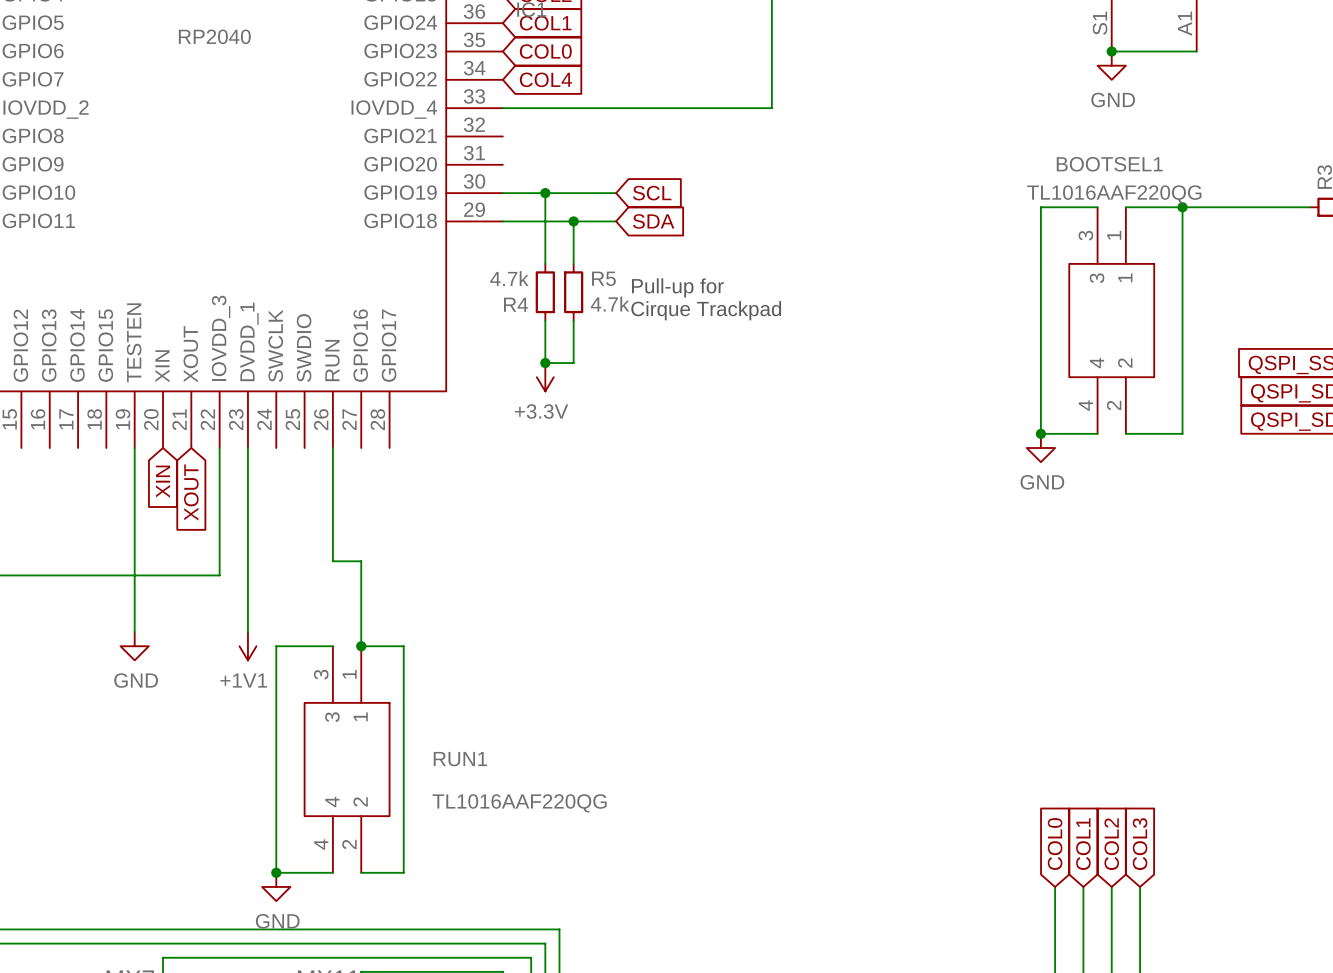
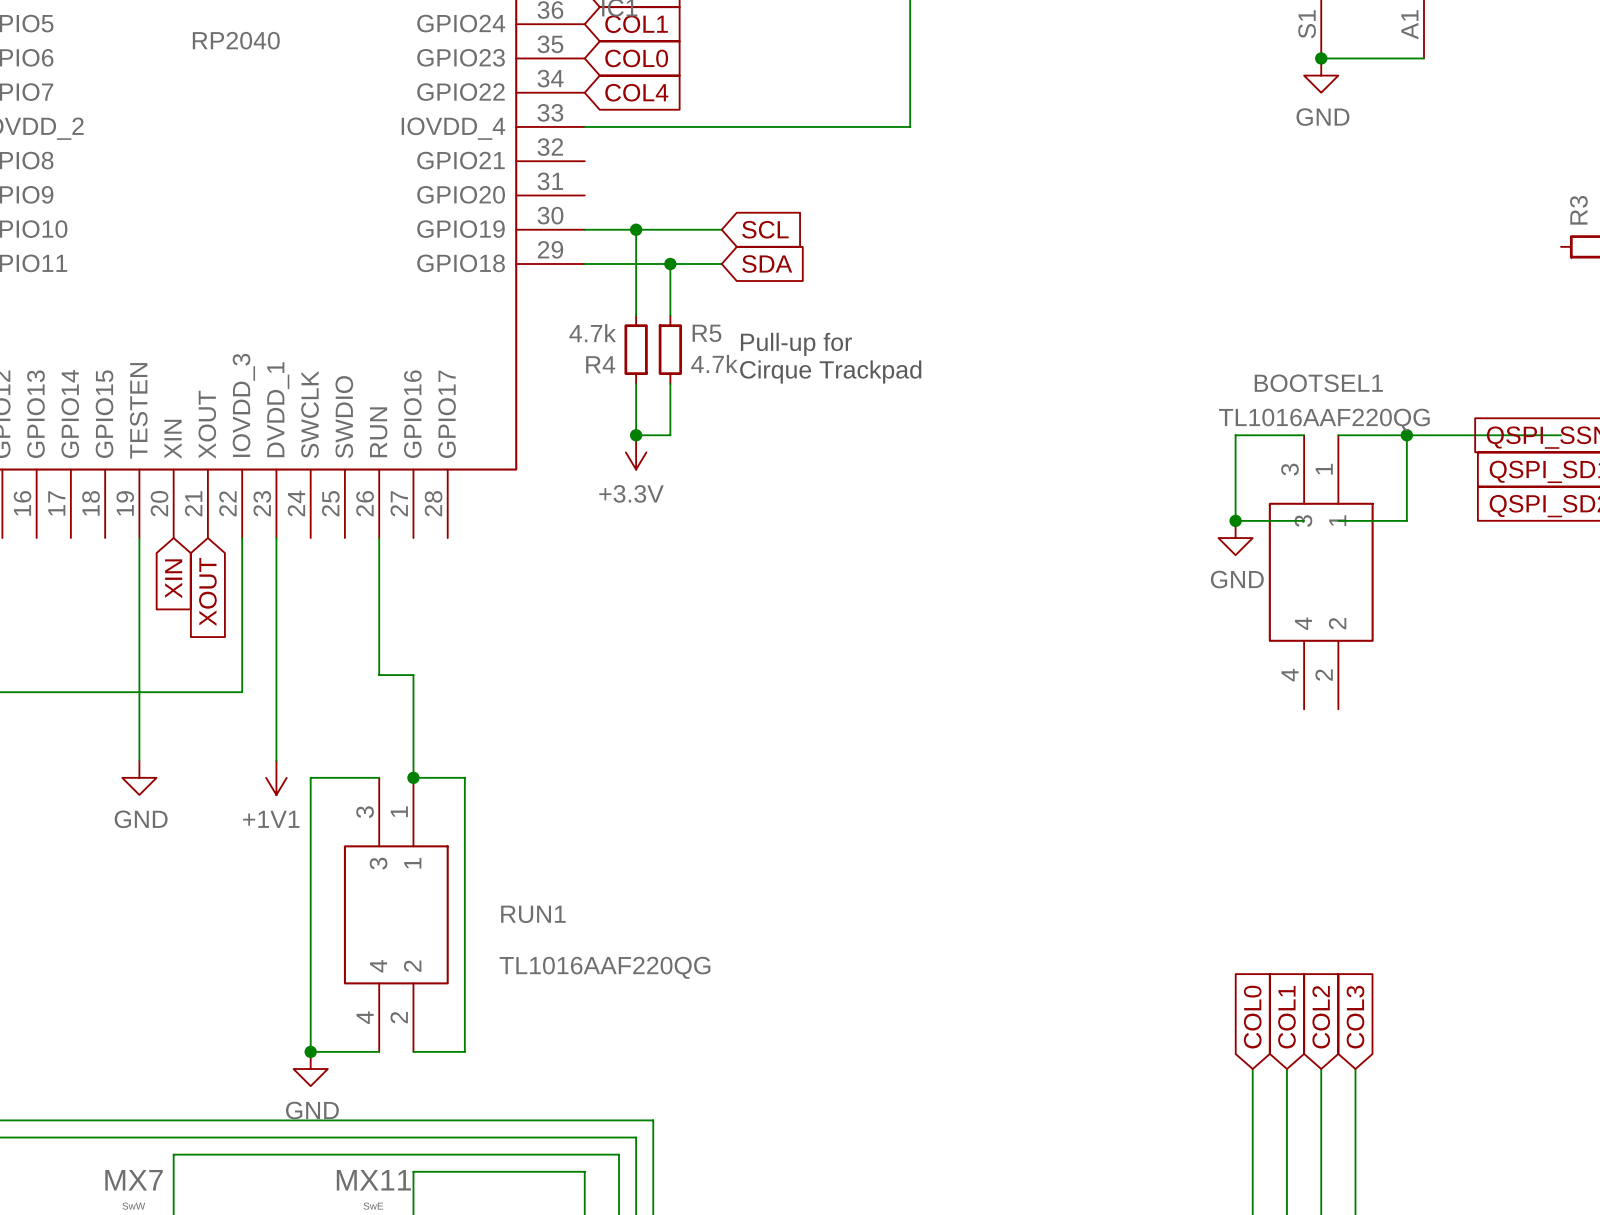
wire: (1097, 207) (1040, 207) (1040, 363) -> (1304, 435) (1235, 435)
wire: (1125, 207) (1309, 207) -> (1338, 435) (1561, 435)
wire: (1182, 207) (1182, 363) -> none
junction: (1182, 207) -> none
BOOTSEL1 position: (1111, 320) -> (1321, 572)
junction: none -> (1406, 435)

